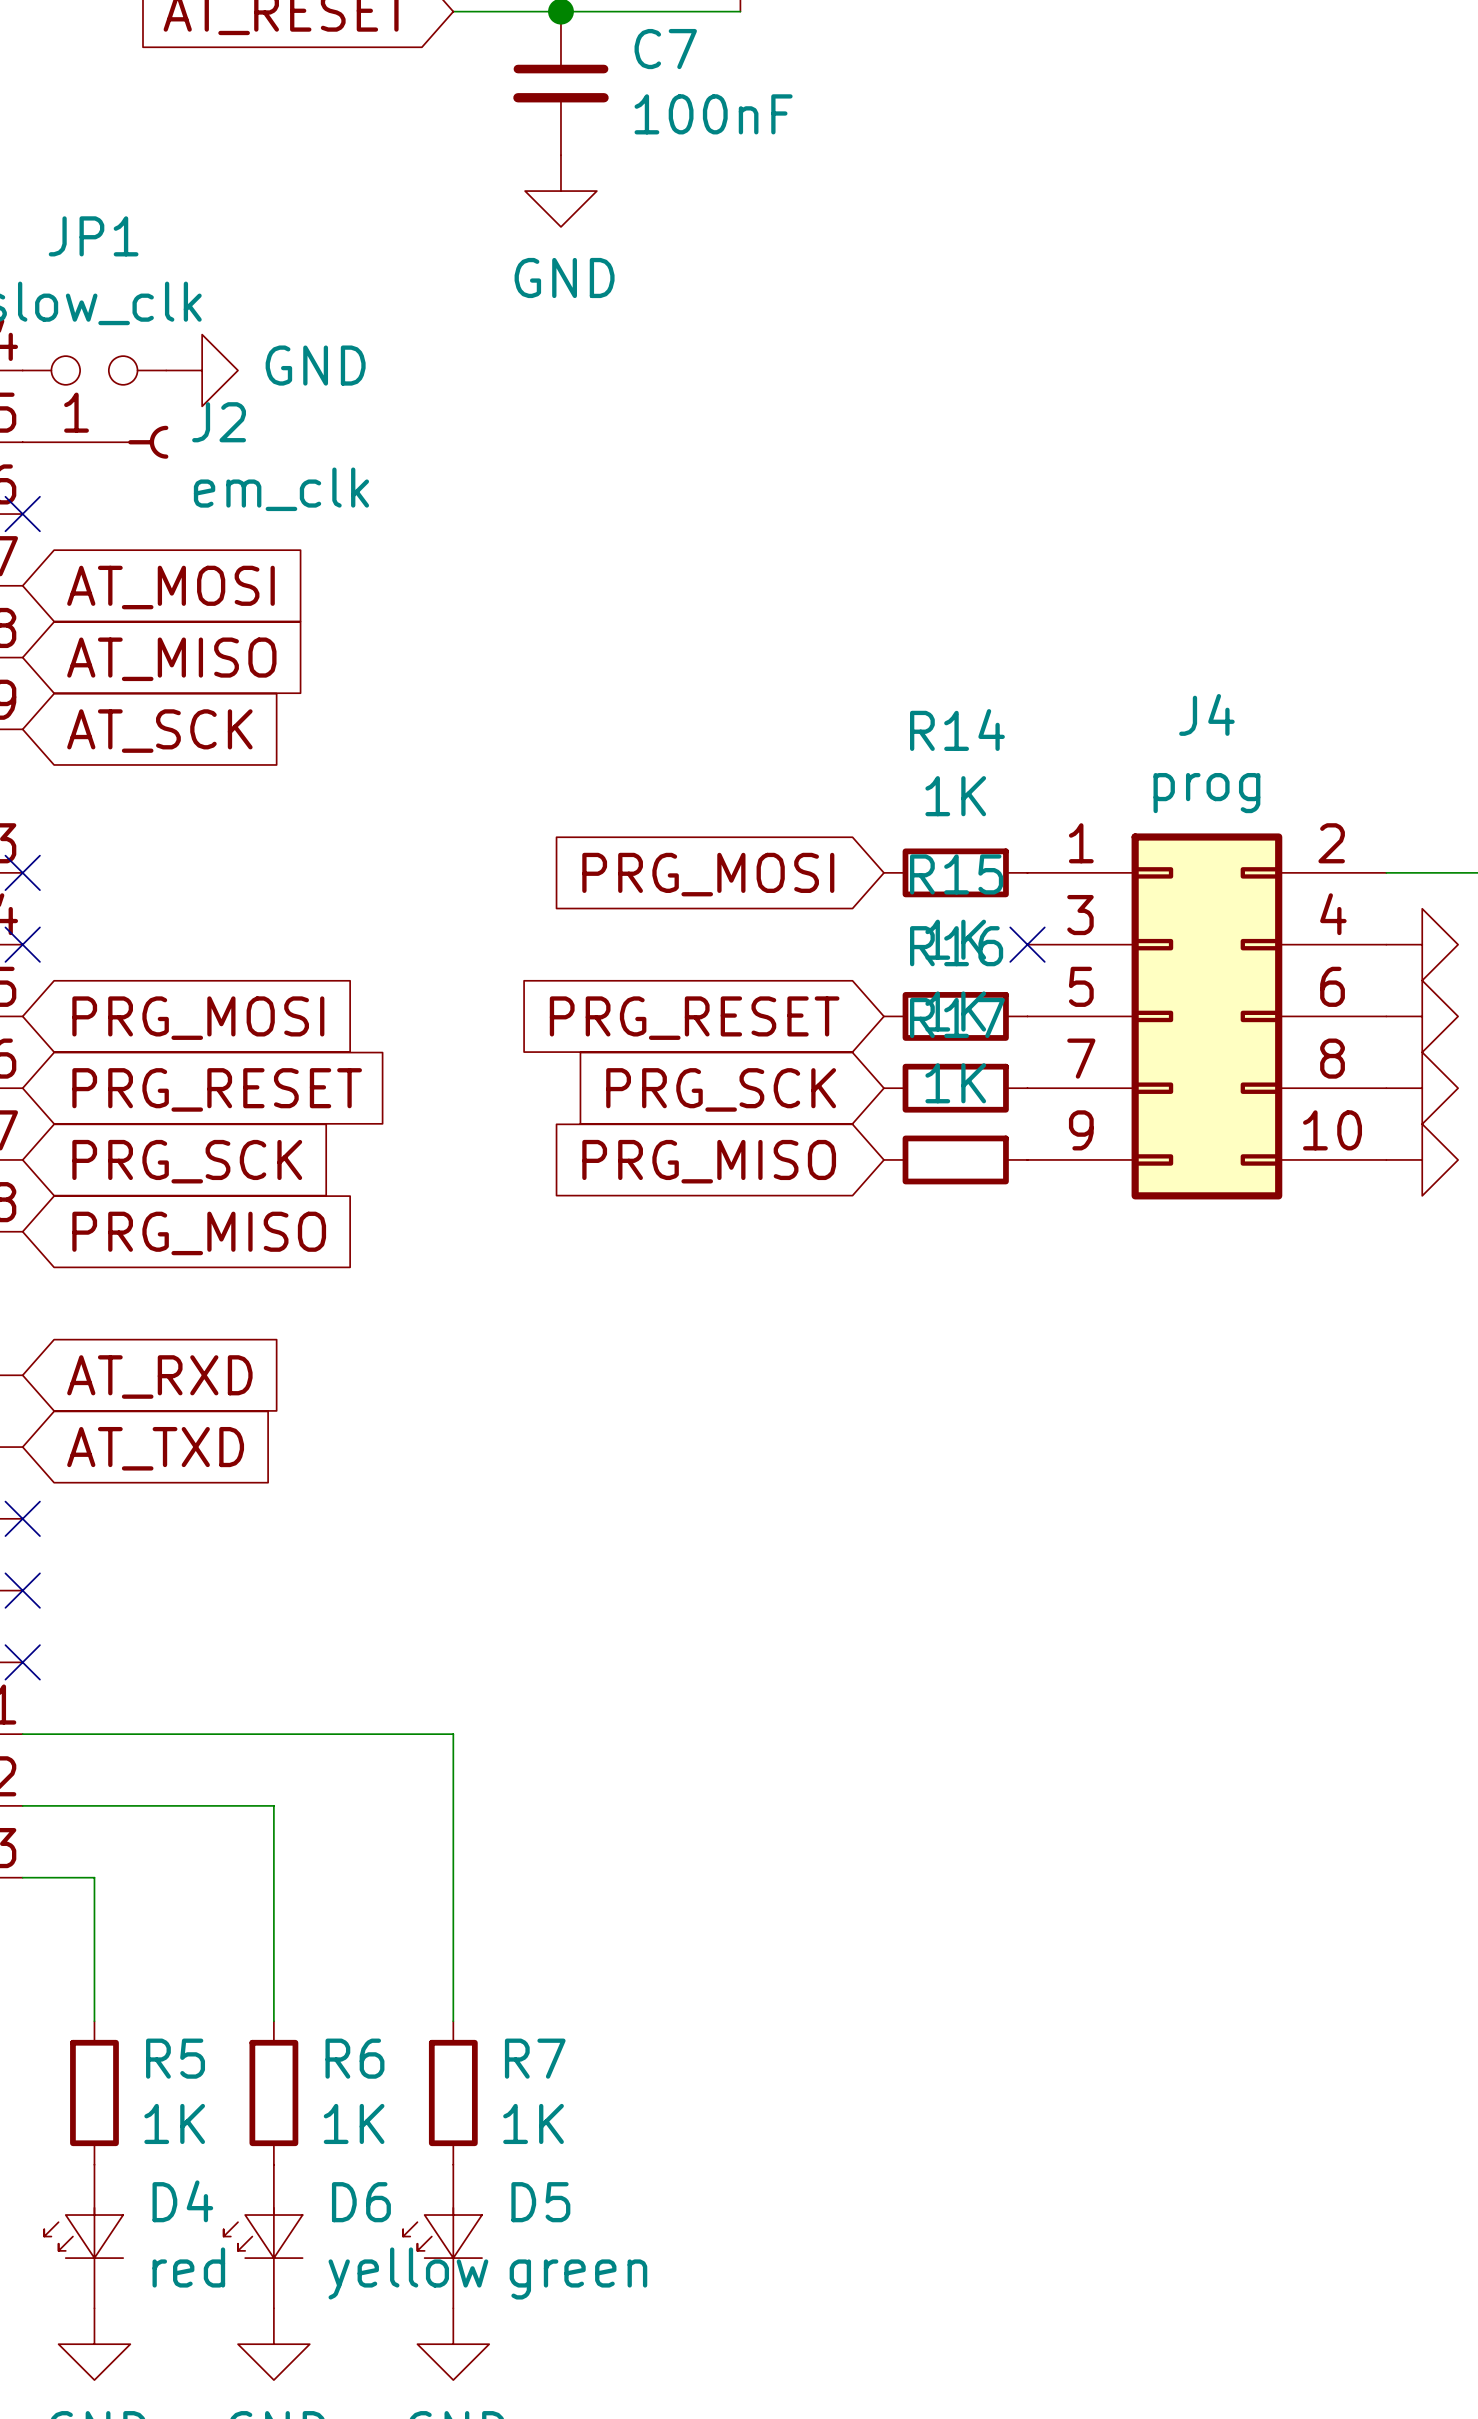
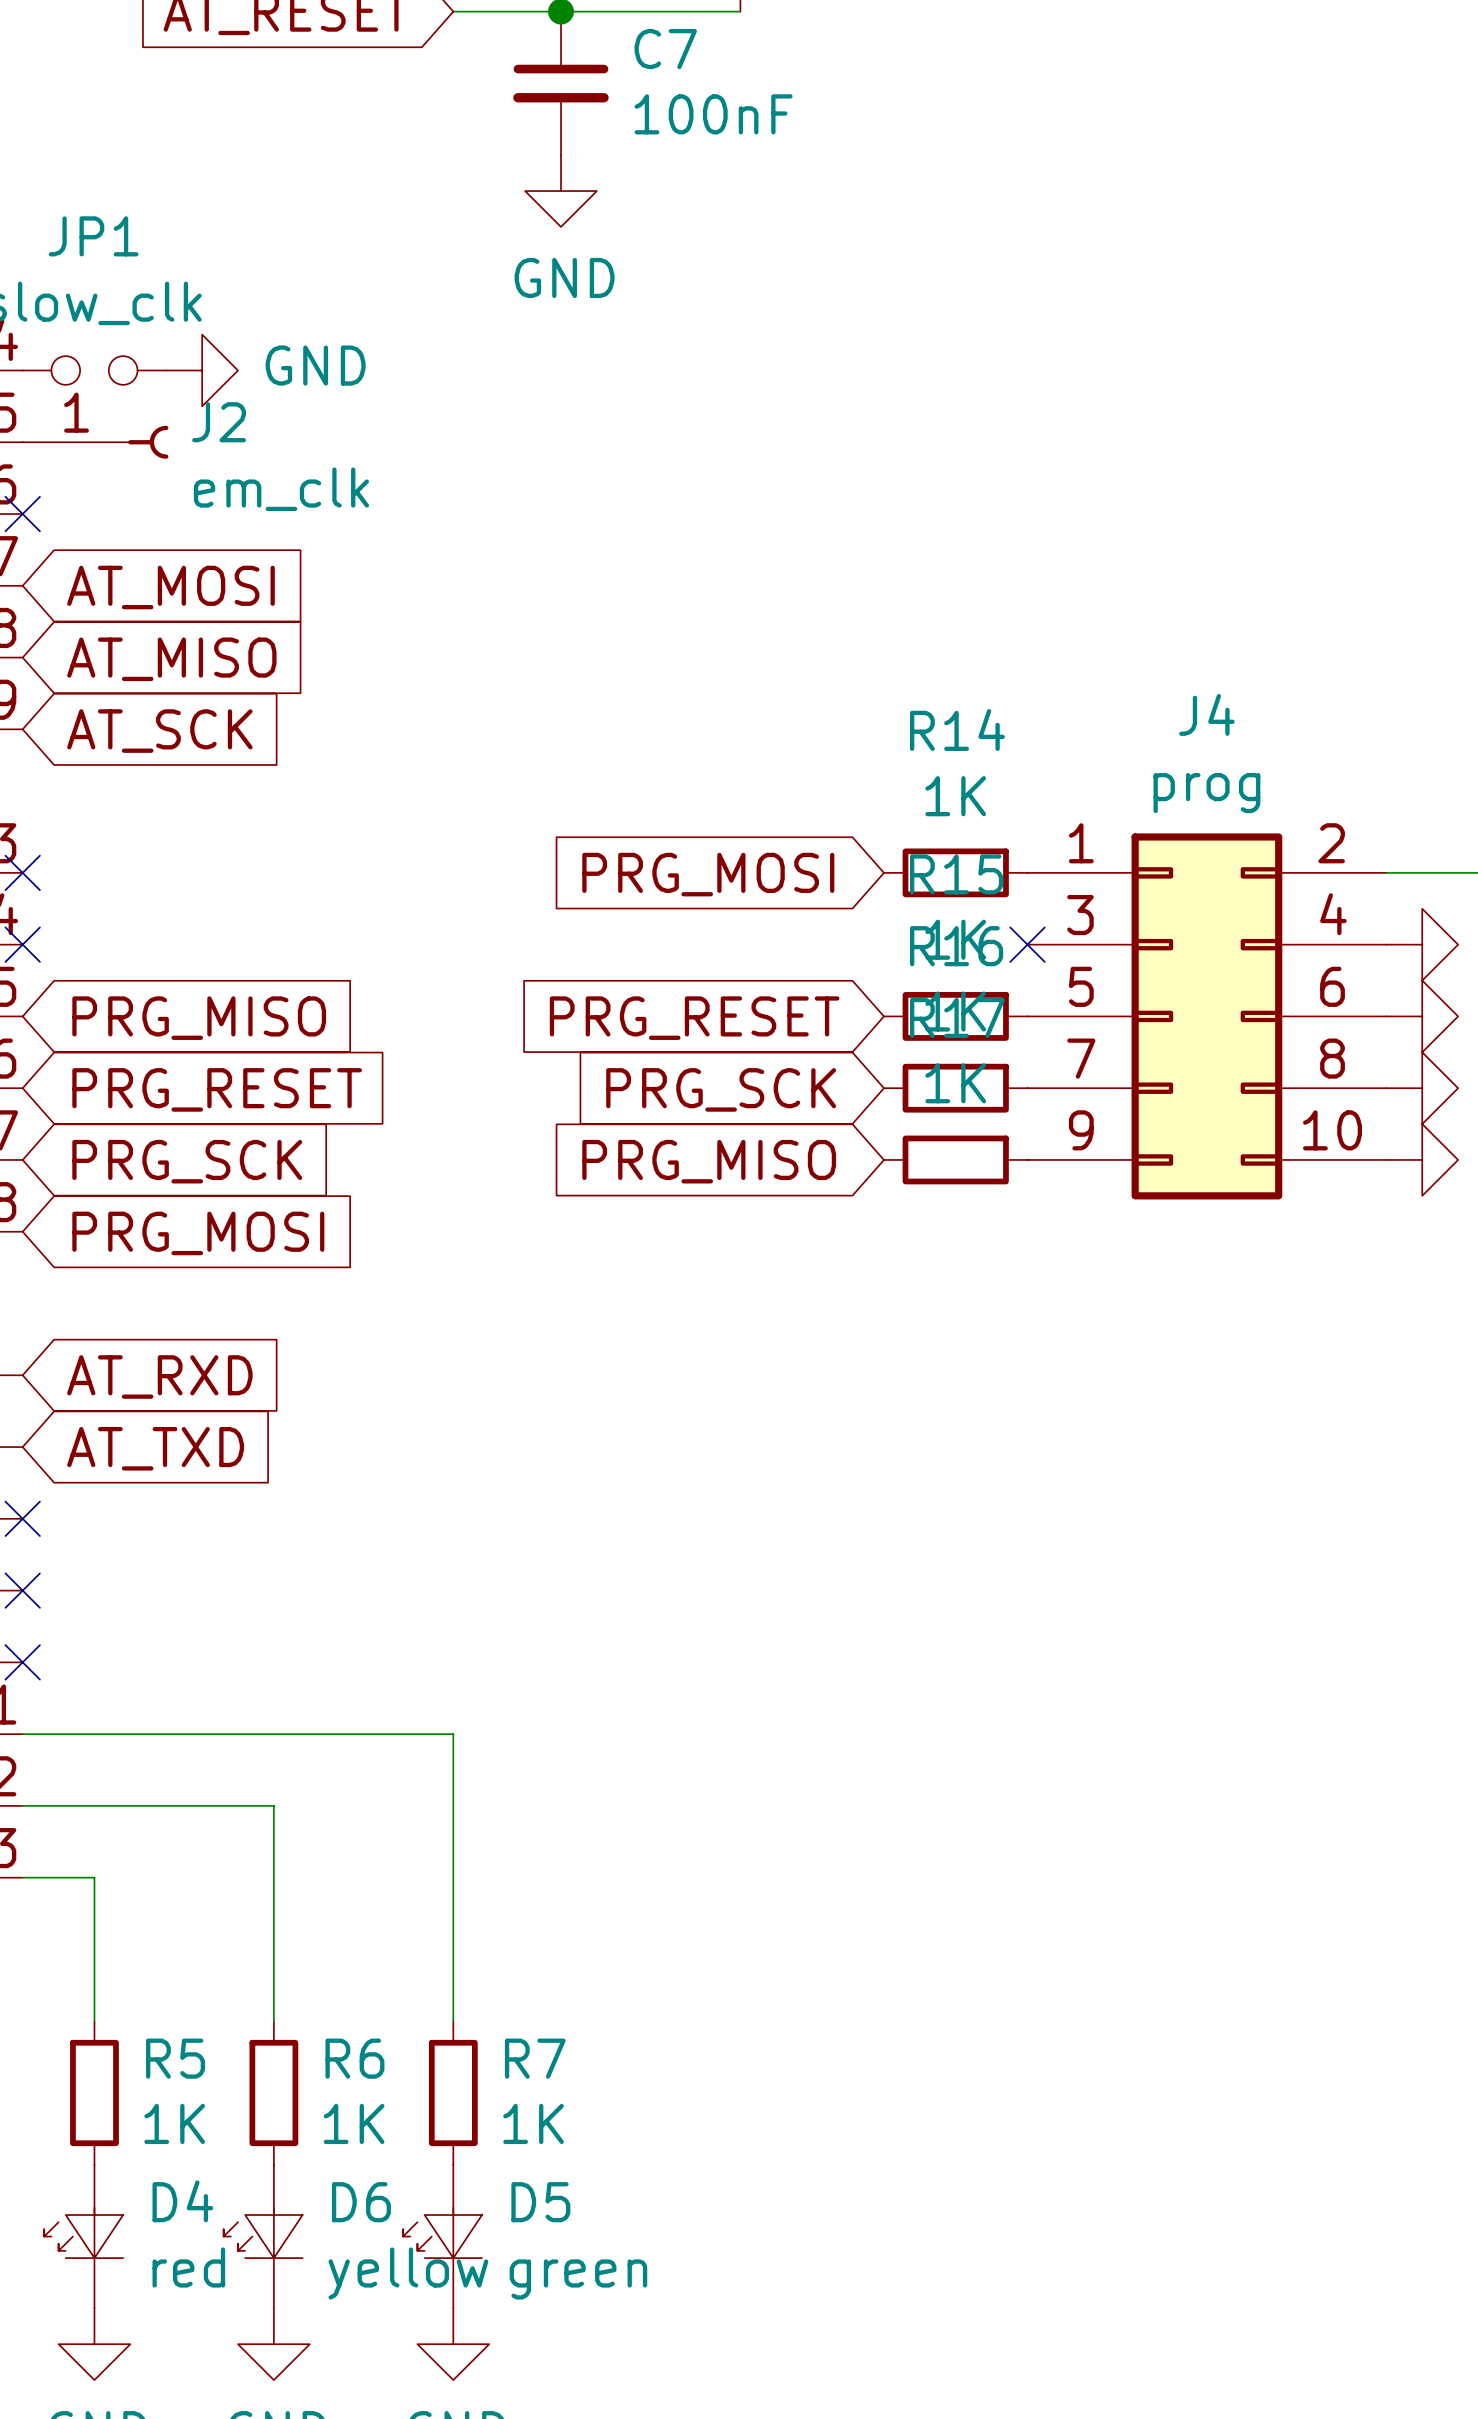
global label: PRG_MOSI (198, 1018) -> PRG_MISO (199, 1018)
global label: PRG_MISO (199, 1233) -> PRG_MOSI (198, 1233)

